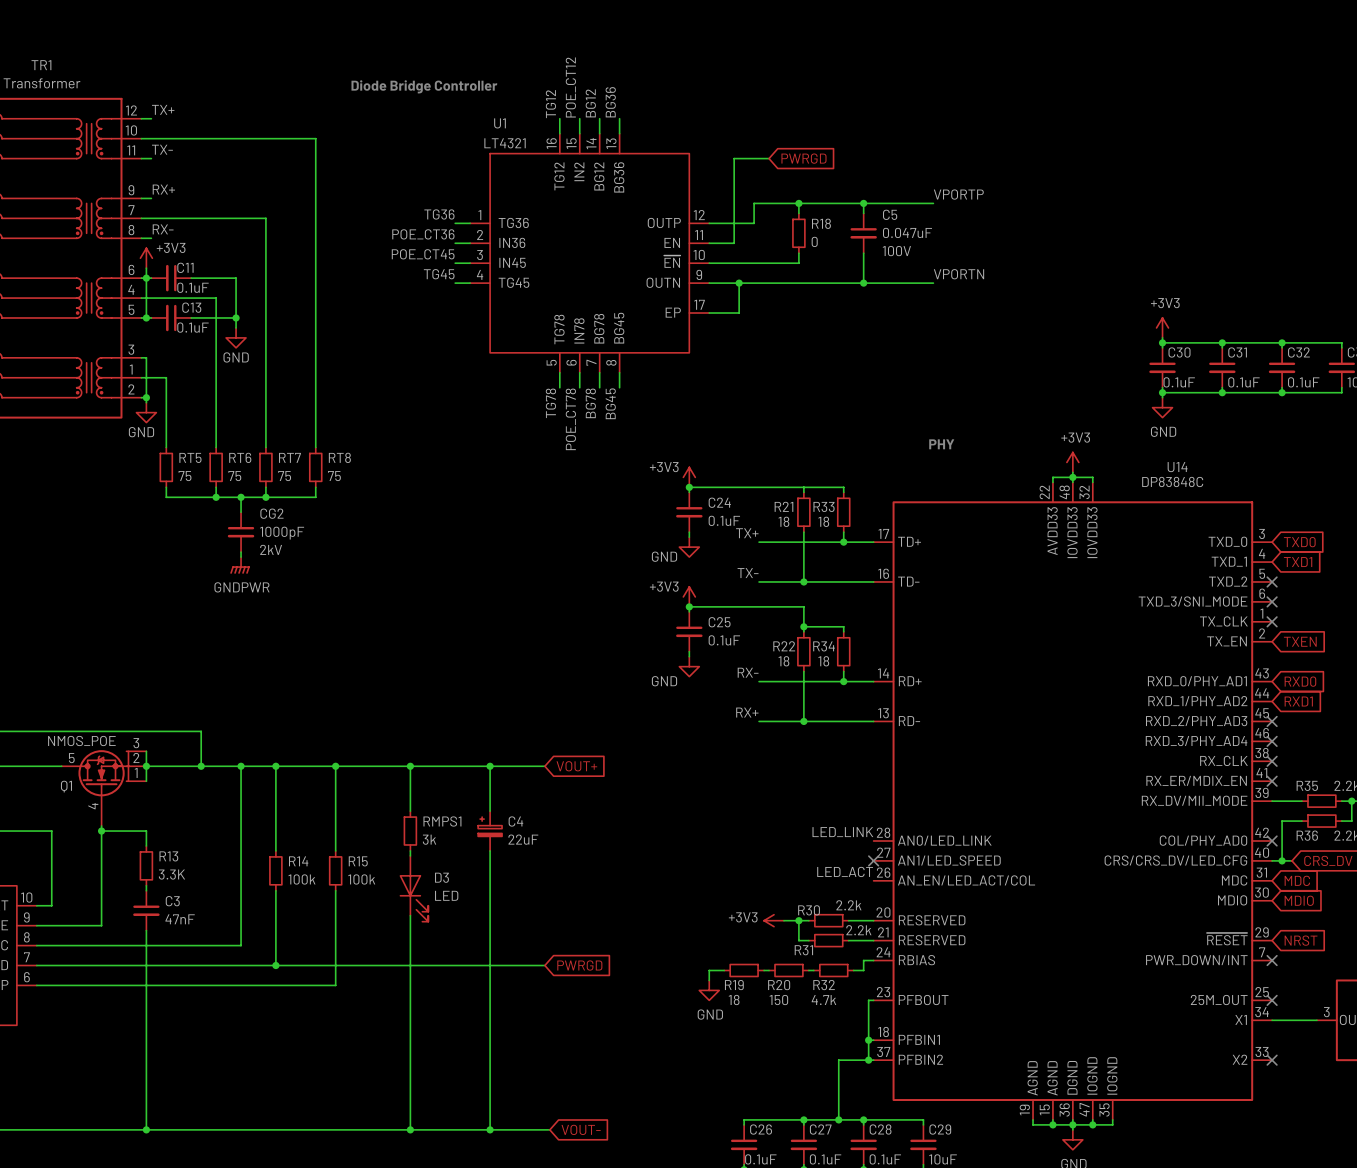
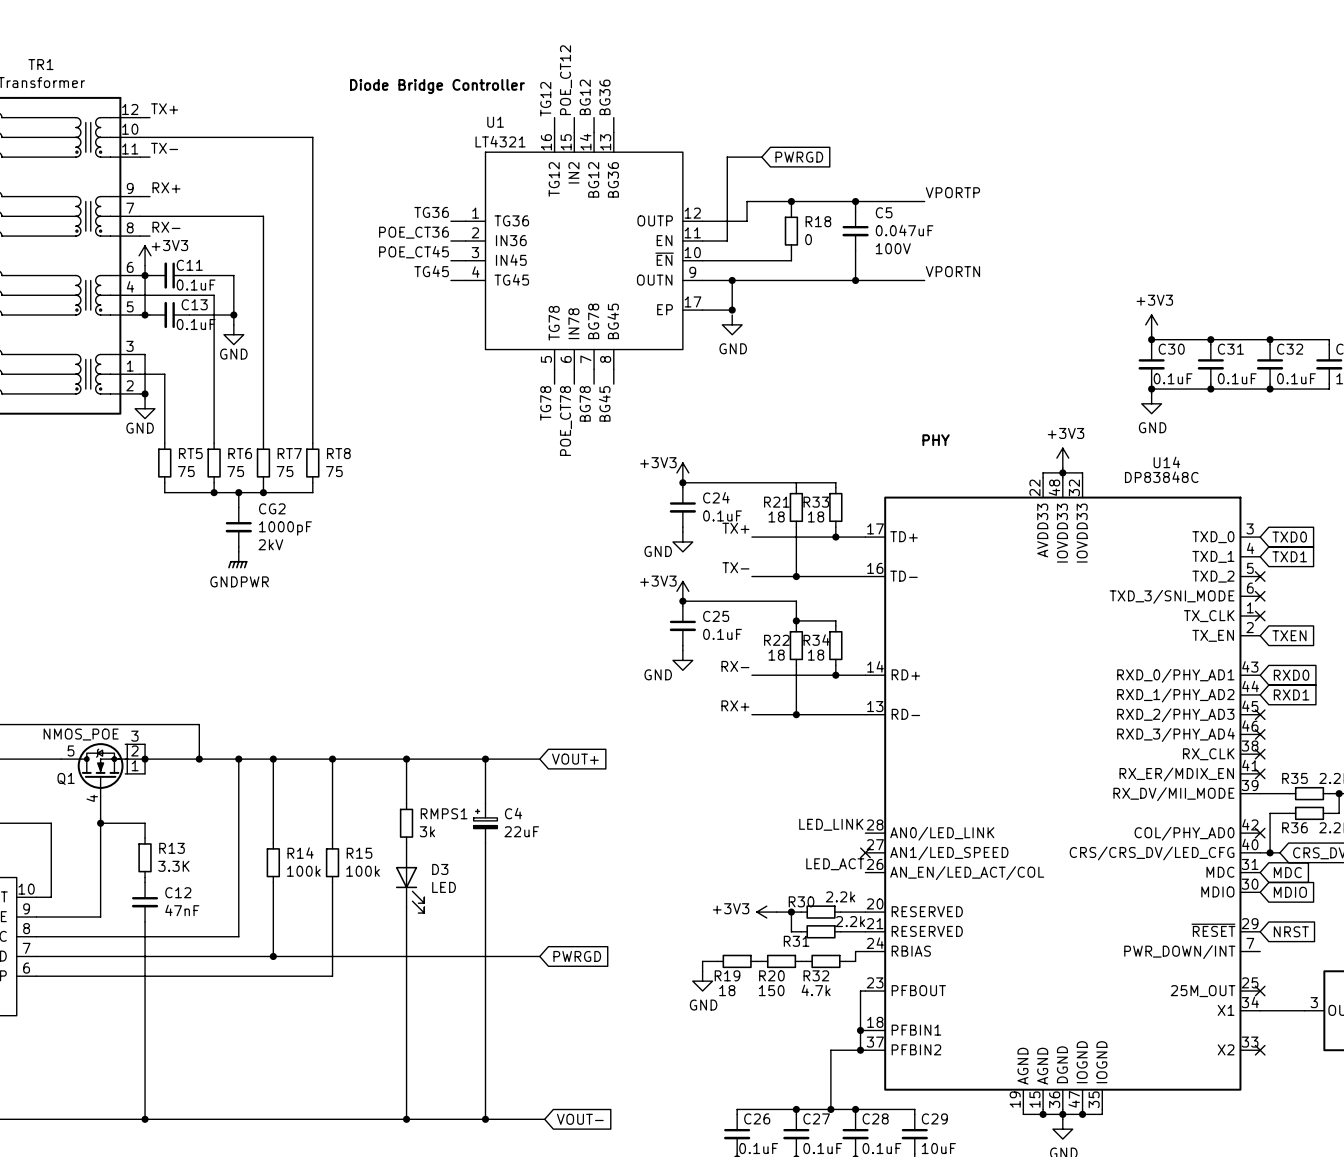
junction: none -> (732, 310)
power symbol: none -> GND (732, 324)
C3 name: C3 (172, 901) -> C12 (178, 892)
no-connect mark: (1272, 960) -> none

